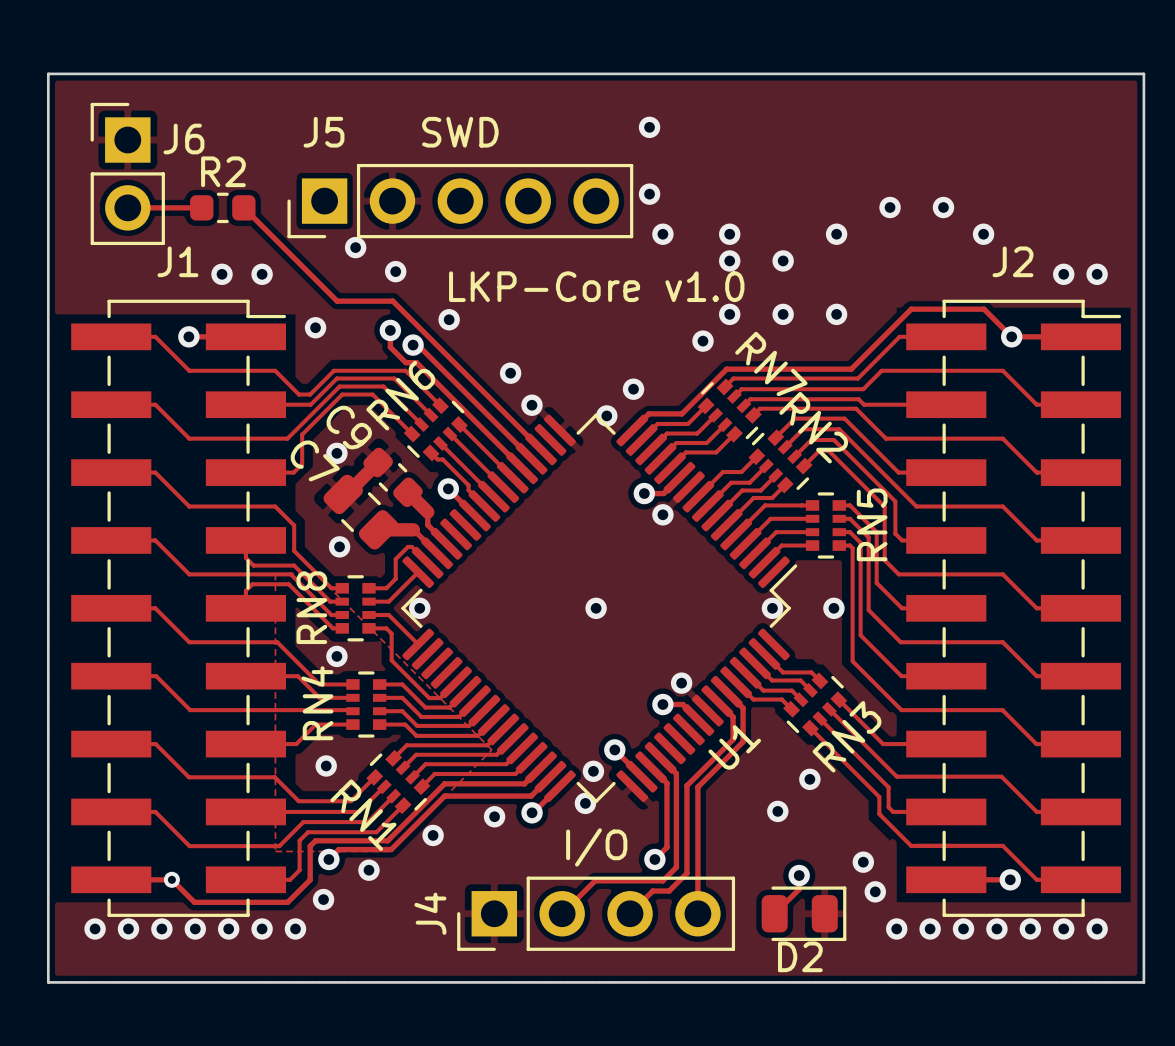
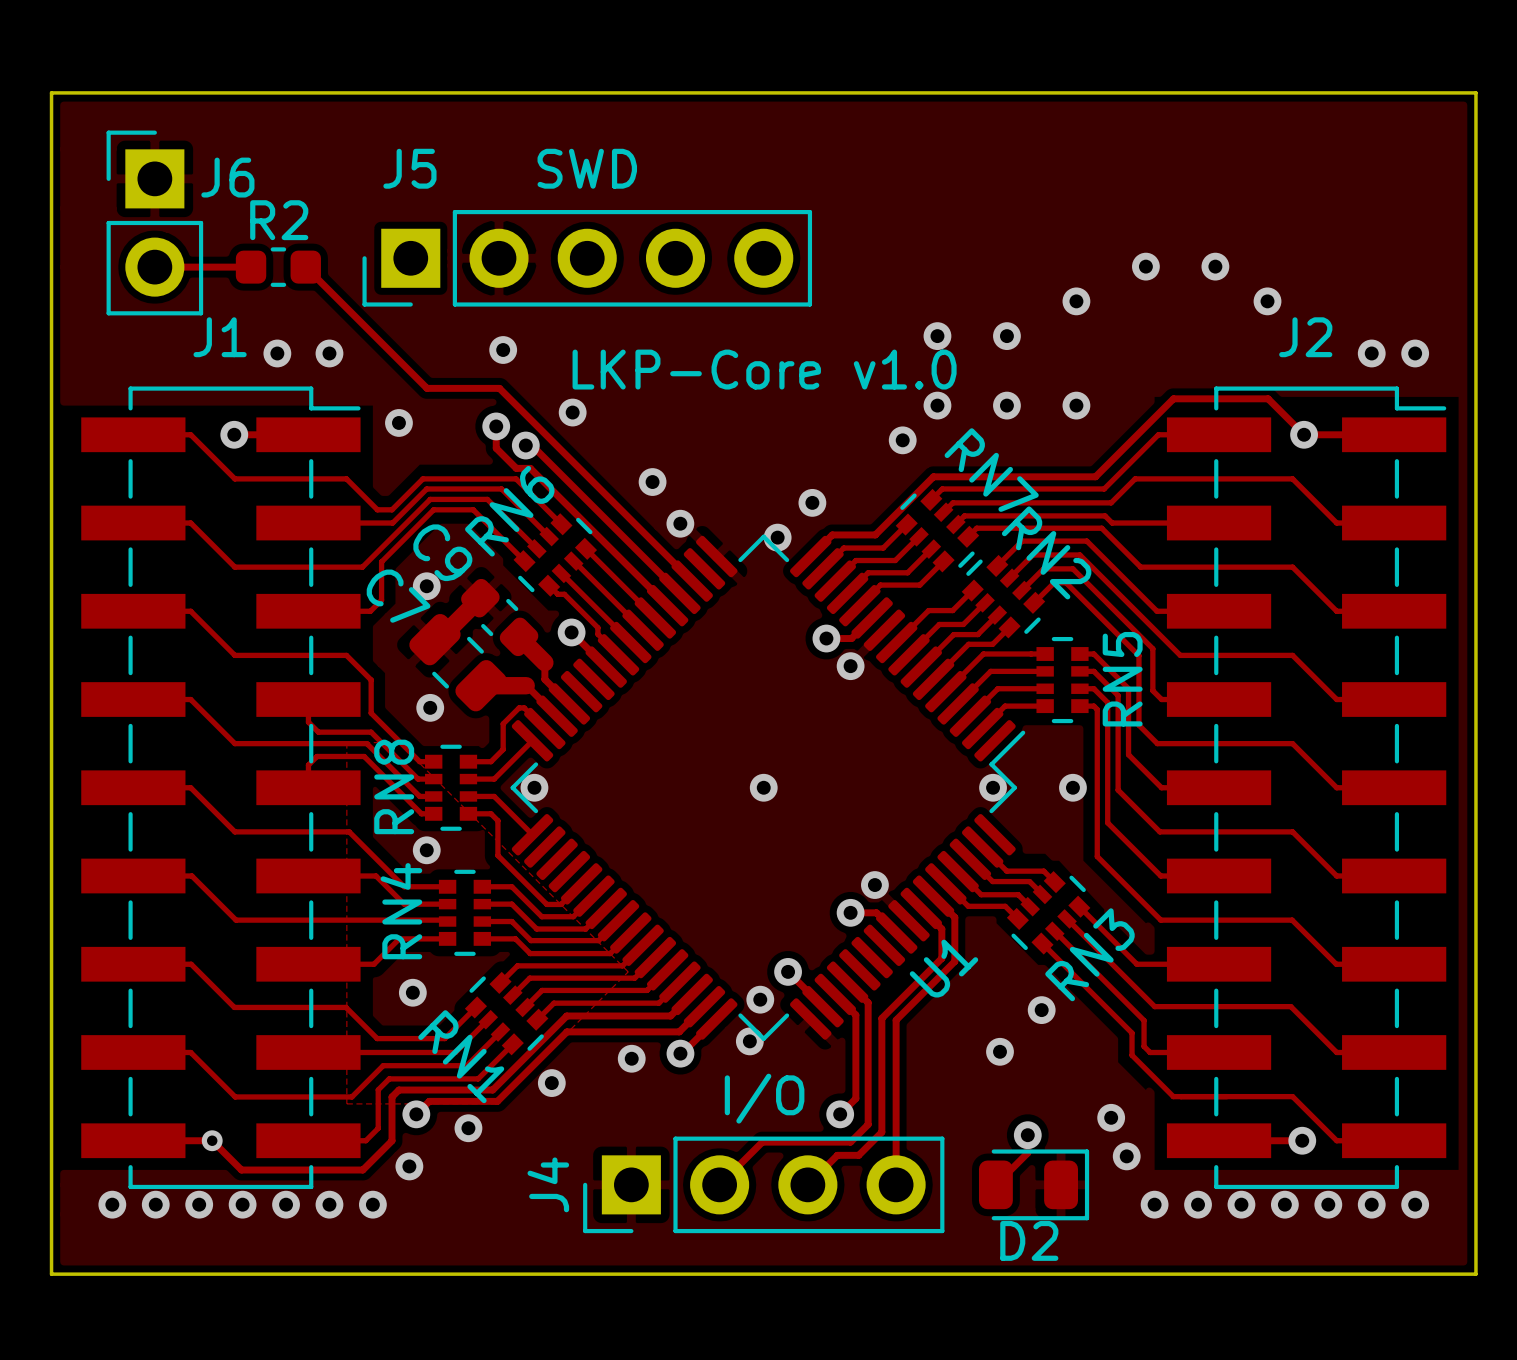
via: (649, 127) -> none
via: (649, 194) -> none
via: (662, 234) -> none
via: (729, 234) -> none
via: (355, 247) -> none

